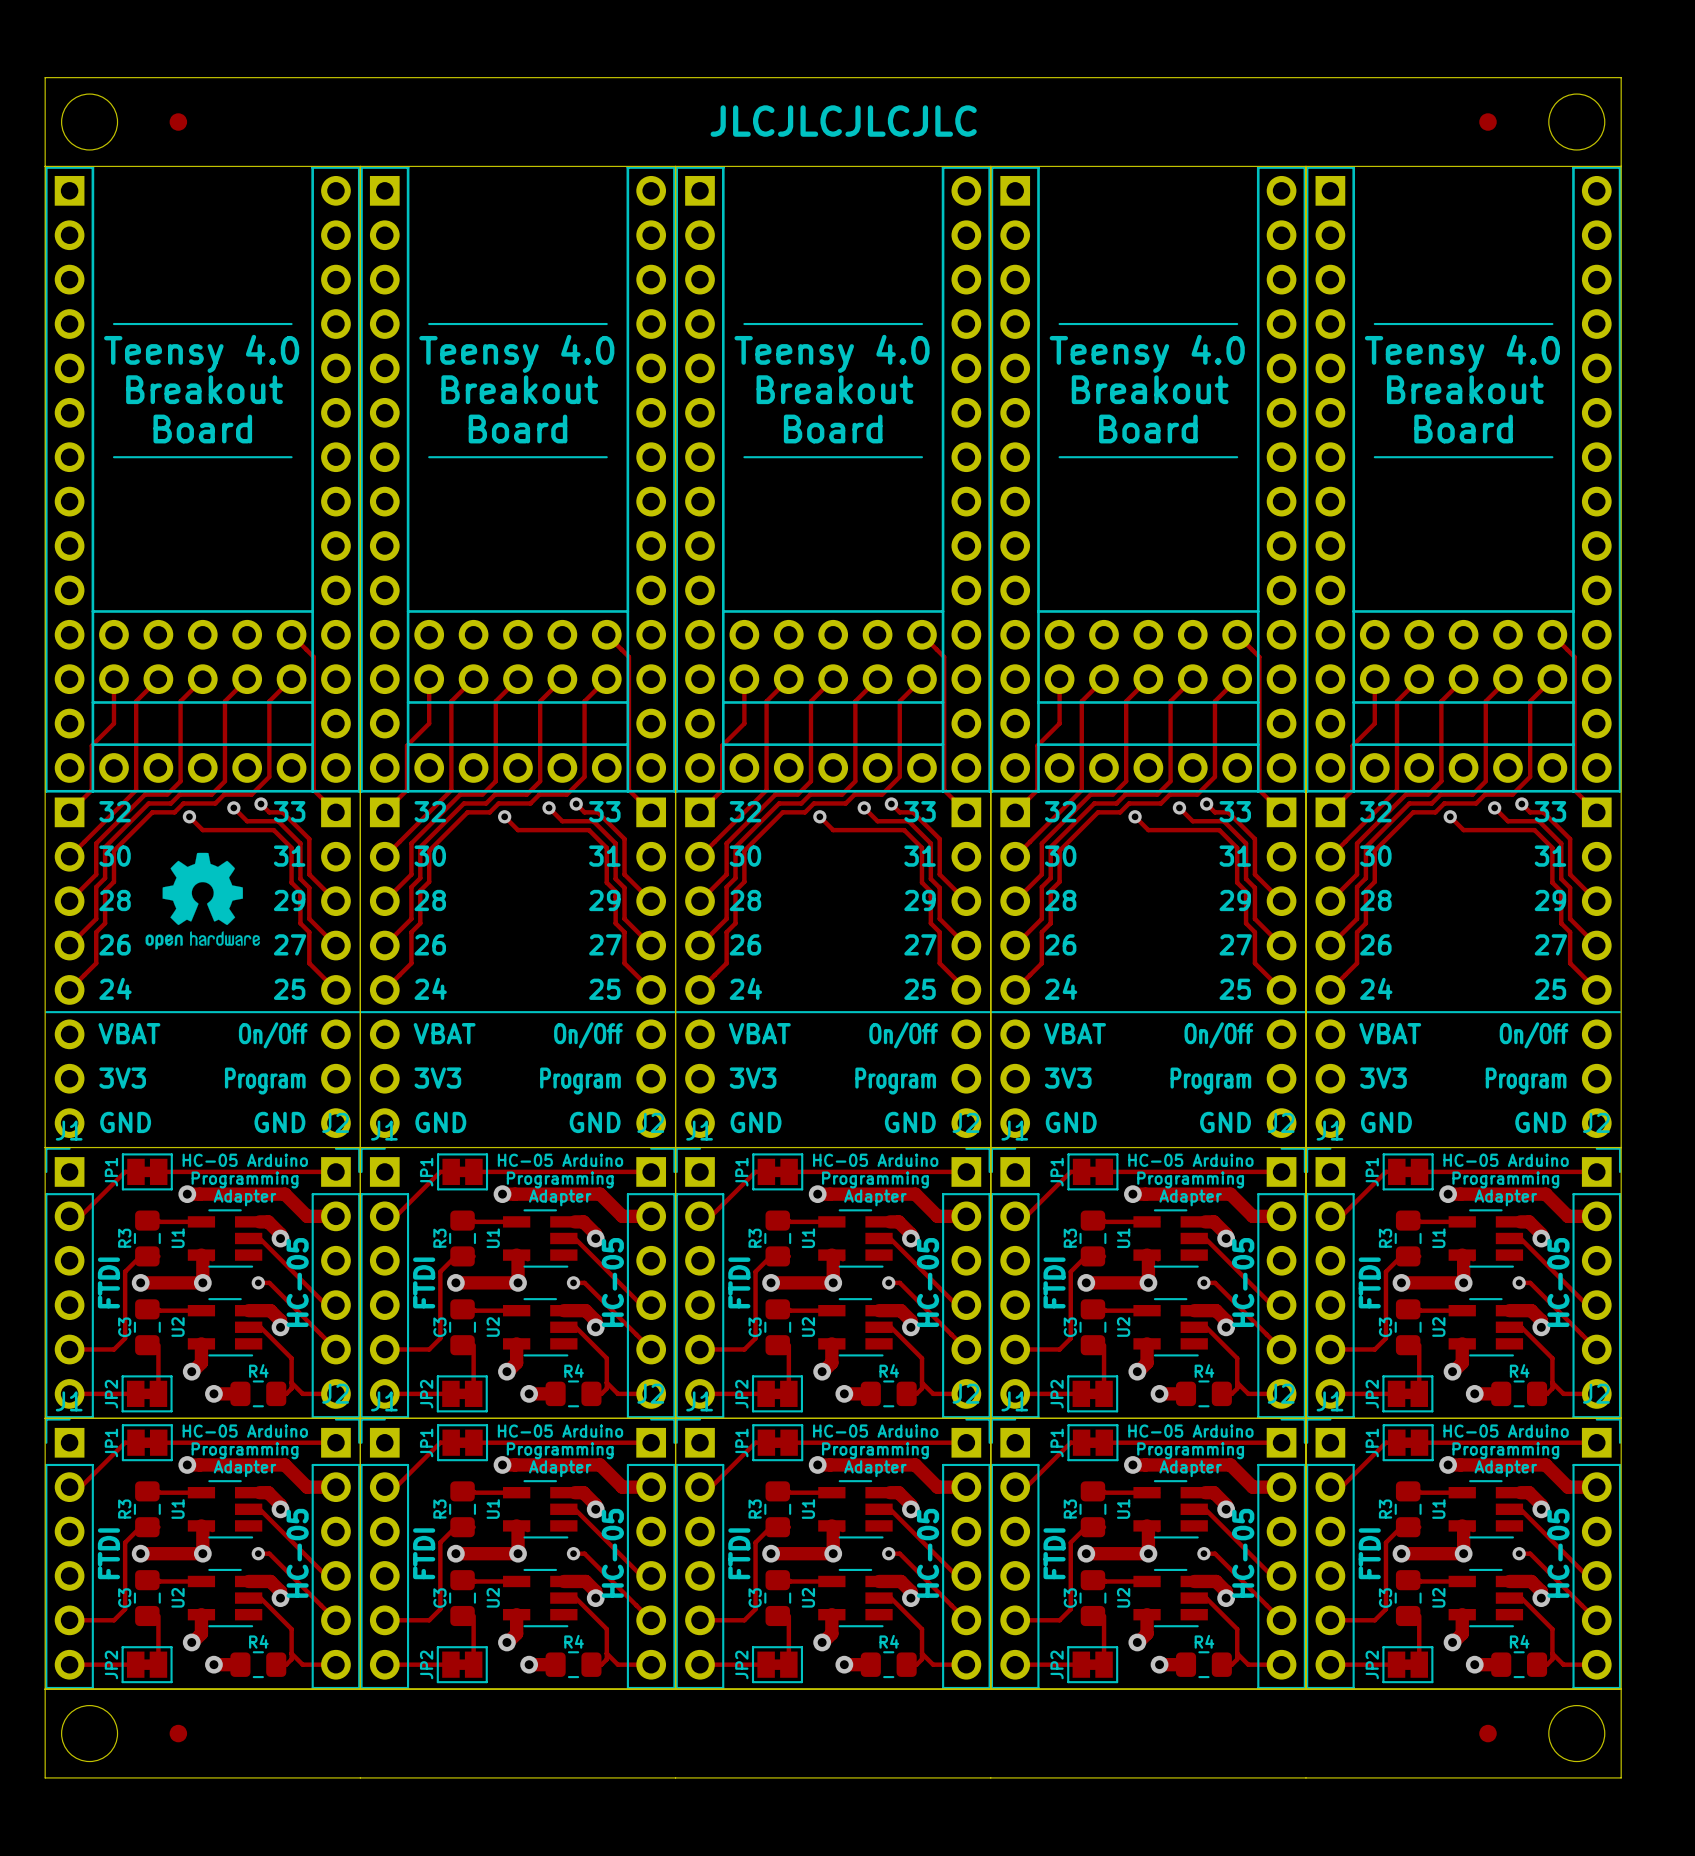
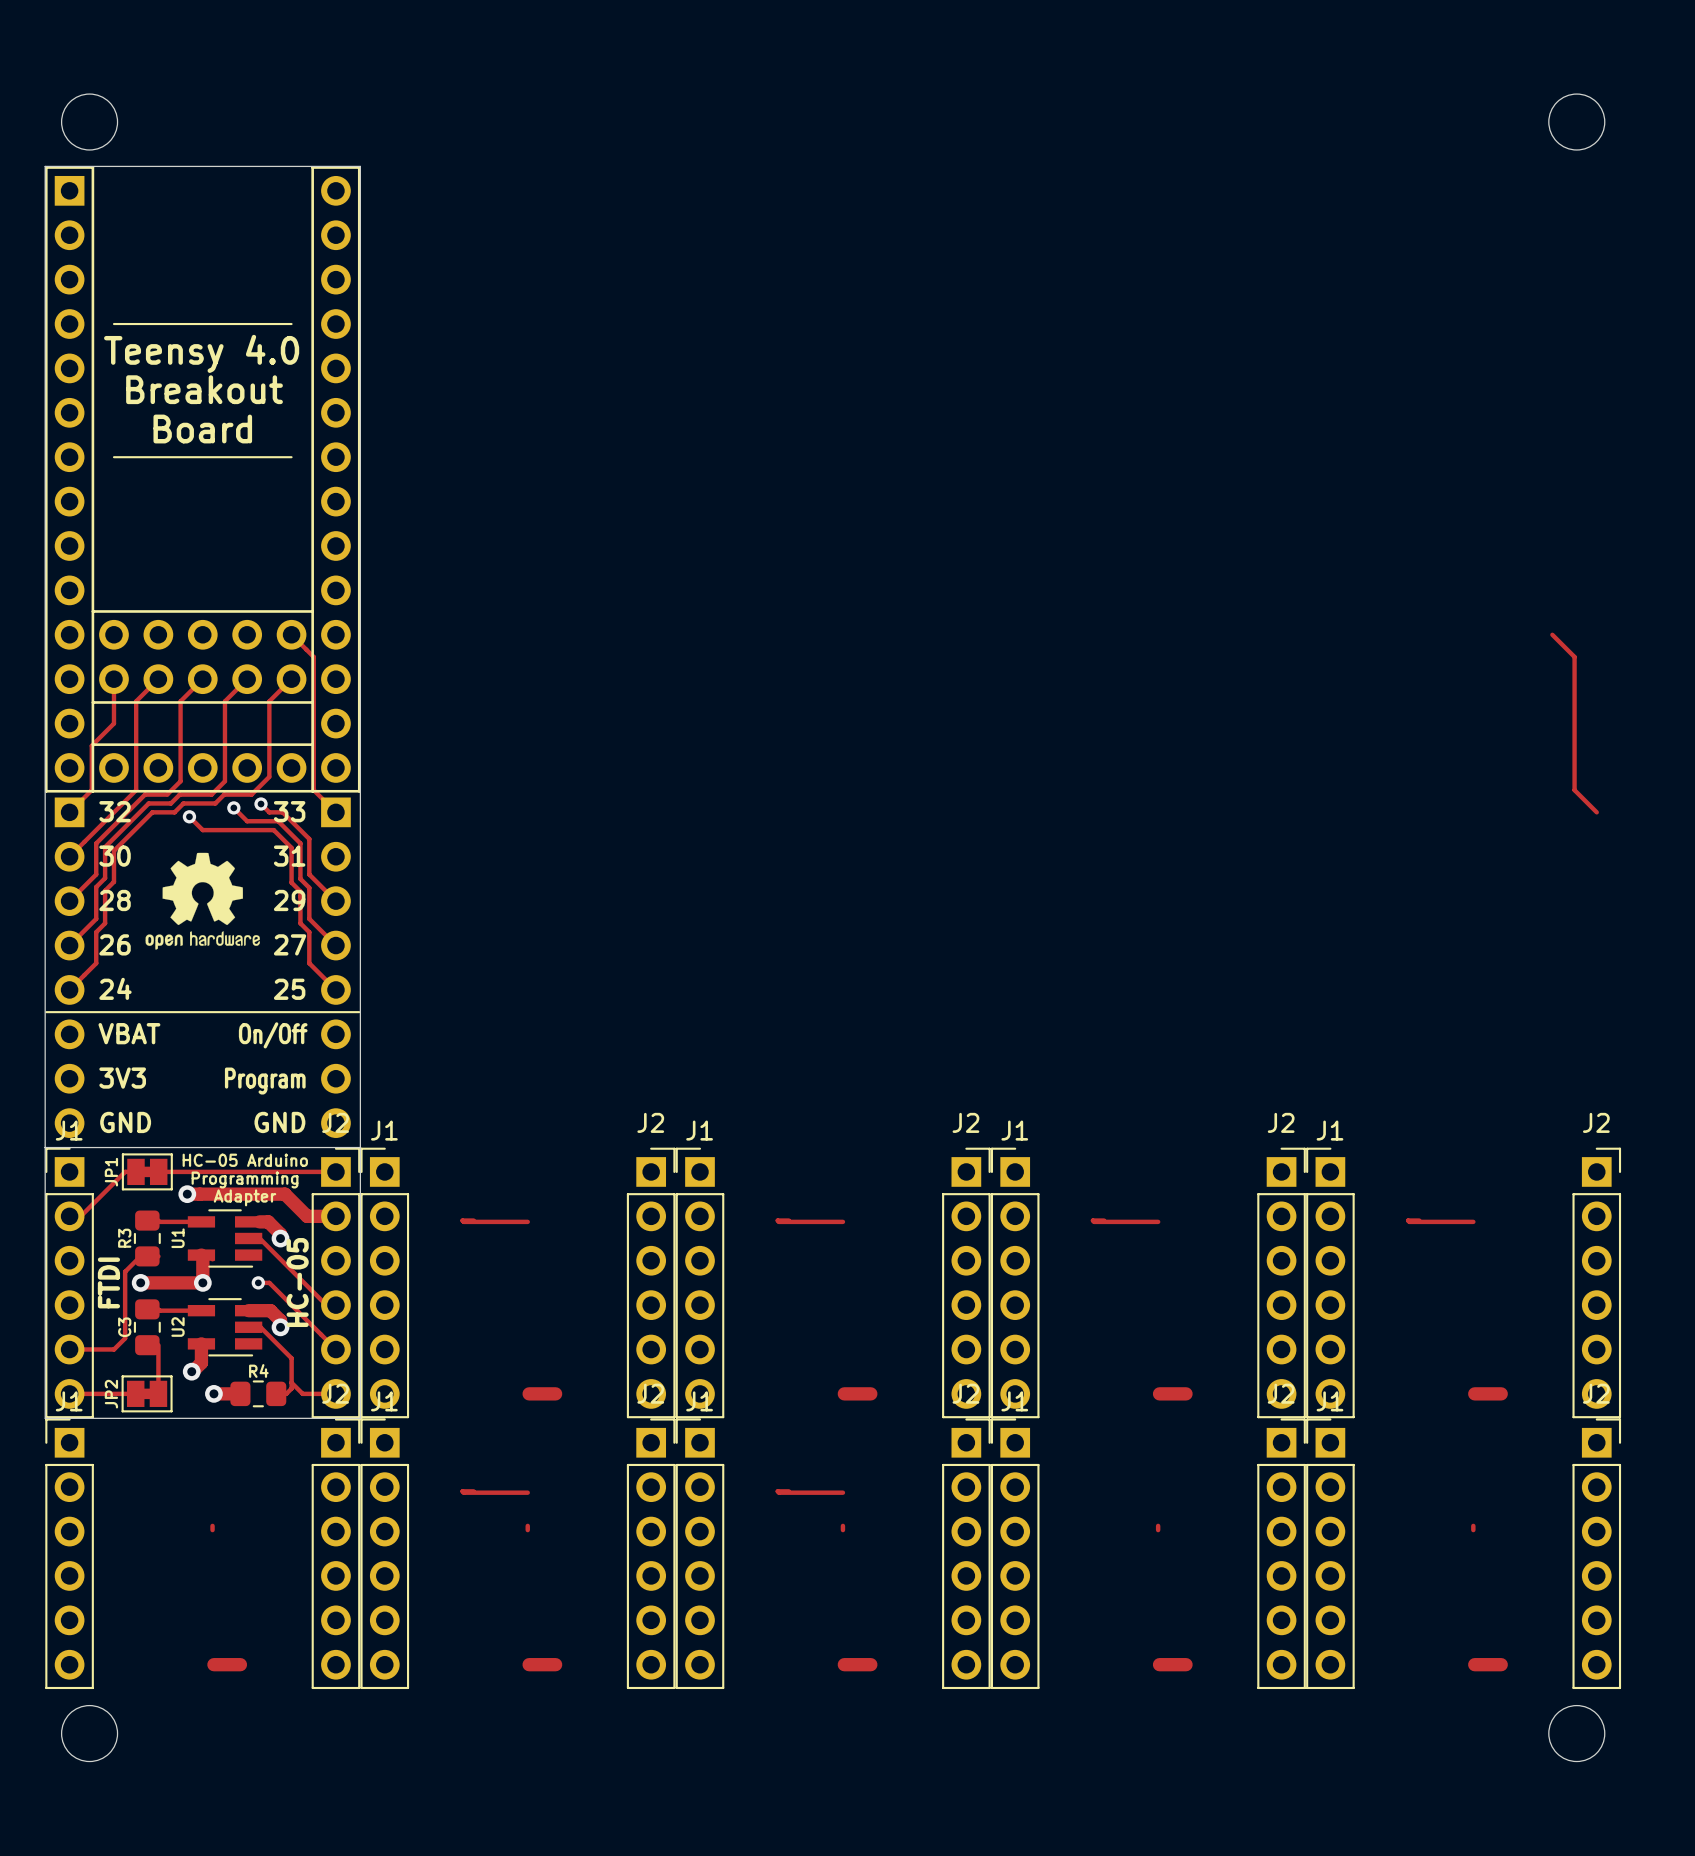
text: JLCJLCJLCJLC (843, 121) -> none
part: (178, 122) -> none
part: (1488, 122) -> none
board edge: (45, 166) (45, 77) (1621, 77) (1621, 1777) (45, 1777) (45, 1147) -> (45, 1418) (45, 1147)
board edge: (360, 166) (1621, 166) -> none
board edge: (675, 166) (675, 1689) (675, 1418) (675, 1147) -> none
board edge: (990, 166) (990, 1689) (990, 1147) -> none
board edge: (1305, 166) (1305, 1689) (1305, 1418) (1305, 1147) -> none
line: (429, 324) (606, 324) -> none
line: (744, 324) (921, 324) -> none
line: (1059, 324) (1237, 324) -> none
line: (1374, 324) (1552, 324) -> none
text: Teensy 4.0 (516, 353) -> none
text: Teensy 4.0 (832, 353) -> none
text: Teensy 4.0 (1147, 353) -> none
text: Teensy 4.0 (1462, 353) -> none
text: Breakout (519, 389) -> none
text: Breakout (834, 389) -> none
text: Breakout (1150, 389) -> none
text: Breakout (1465, 389) -> none
text: Board (517, 429) -> none
text: Board (833, 429) -> none
text: Board (1148, 429) -> none
text: Board (1463, 429) -> none
line: (429, 457) (606, 457) -> none
line: (744, 457) (921, 457) -> none
line: (1059, 457) (1237, 457) -> none
line: (1374, 457) (1552, 457) -> none
part: (517, 479) -> none
part: (833, 479) -> none
part: (1148, 479) -> none
part: (1463, 479) -> none
track: (606, 634) (628, 656) (628, 790) (651, 812) -> none
track: (921, 634) (944, 656) (944, 790) (966, 812) -> none
track: (1237, 634) (1259, 656) (1259, 790) (1281, 812) -> none
track: (429, 679) (429, 723) (406, 745) (406, 790) (384, 812) -> none
track: (473, 679) (451, 701) (451, 790) (384, 856) -> none
track: (517, 679) (495, 701) (495, 781) (482, 794) (460, 794) (411, 843) (411, 874) (384, 901) -> none
track: (562, 679) (540, 701) (540, 781) (526, 794) (494, 794) -> none
track: (606, 679) (584, 701) (584, 776) (566, 794) (539, 794) (530, 803) (498, 803) (489, 812) (467, 812) (429, 850) (429, 881) (420, 890) (420, 923) (411, 932) (411, 963) (384, 989) -> none
track: (744, 679) (744, 723) (722, 745) (722, 790) (699, 812) -> none
track: (788, 679) (766, 701) (766, 790) (699, 856) -> none
track: (833, 679) (810, 701) (810, 781) (797, 794) (775, 794) (726, 843) (726, 874) (699, 901) -> none
track: (877, 679) (855, 701) (855, 781) (842, 794) (810, 794) -> none
track: (921, 679) (899, 701) (899, 776) (882, 794) (854, 794) (845, 803) (813, 803) (805, 812) (782, 812) (744, 850) (744, 881) (735, 890) (735, 923) (726, 932) (726, 963) (699, 989) -> none
track: (1059, 679) (1059, 723) (1037, 745) (1037, 790) (1015, 812) -> none
track: (1103, 679) (1081, 701) (1081, 790) (1015, 856) -> none
track: (1148, 679) (1126, 701) (1126, 781) (1112, 794) (1090, 794) (1041, 843) (1041, 874) (1015, 901) -> none
track: (1192, 679) (1170, 701) (1170, 781) (1157, 794) (1125, 794) -> none
track: (1237, 679) (1214, 701) (1214, 776) (1197, 794) (1169, 794) (1160, 803) (1129, 803) (1120, 812) (1098, 812) (1059, 850) (1059, 881) (1050, 890) (1050, 923) (1041, 932) (1041, 963) (1015, 989) -> none
track: (1374, 679) (1374, 723) (1352, 745) (1352, 790) (1330, 812) -> none
track: (1419, 679) (1396, 701) (1396, 790) (1330, 856) -> none
track: (1463, 679) (1441, 701) (1441, 781) (1428, 794) (1405, 794) (1357, 843) (1357, 874) (1330, 901) -> none
track: (1507, 679) (1485, 701) (1485, 781) (1472, 794) (1440, 794) -> none
track: (1552, 679) (1530, 701) (1530, 776) (1512, 794) (1485, 794) (1476, 803) (1444, 803) (1435, 812) (1413, 812) (1374, 850) (1374, 881) (1365, 890) (1365, 923) (1357, 932) (1357, 963) (1330, 989) -> none
track: (494, 794) (486, 803) (463, 803) (420, 847) (420, 878) (411, 887) (411, 918) (384, 945) -> none
track: (810, 794) (801, 803) (779, 803) (735, 847) (735, 878) (726, 887) (726, 918) (699, 945) -> none
track: (1125, 794) (1116, 803) (1094, 803) (1050, 847) (1050, 878) (1041, 887) (1041, 918) (1015, 945) -> none
track: (1440, 794) (1431, 803) (1409, 803) (1365, 847) (1365, 878) (1357, 887) (1357, 918) (1330, 945) -> none
track: (576, 804) (584, 812) (597, 812) (624, 838) (624, 874) (651, 901) -> none
via: (576, 804) -> none
track: (891, 804) (899, 812) (913, 812) (939, 838) (939, 874) (966, 901) -> none
via: (891, 804) -> none
track: (1206, 804) (1214, 812) (1228, 812) (1254, 838) (1254, 874) (1281, 901) -> none
via: (1206, 804) -> none
track: (1521, 804) (1530, 812) (1543, 812) (1570, 838) (1570, 874) (1596, 901) -> none
via: (1521, 804) -> none
track: (549, 807) (562, 821) (593, 821) (615, 843) (615, 878) (624, 887) (624, 918) (651, 945) -> none
via: (549, 807) -> none
track: (864, 807) (877, 821) (908, 821) (930, 843) (930, 878) (939, 887) (939, 918) (966, 945) -> none
via: (864, 807) -> none
track: (1179, 807) (1192, 821) (1223, 821) (1246, 843) (1246, 878) (1254, 887) (1254, 918) (1281, 945) -> none
via: (1179, 807) -> none
track: (1494, 807) (1507, 821) (1539, 821) (1561, 843) (1561, 878) (1570, 887) (1570, 918) (1596, 945) -> none
via: (1494, 807) -> none
text: 32 (430, 811) -> none
text: 33 (604, 811) -> none
text: 32 (745, 811) -> none
text: 33 (920, 811) -> none
text: 32 (1060, 811) -> none
text: 33 (1235, 811) -> none
text: 32 (1375, 811) -> none
text: 33 (1550, 811) -> none
track: (504, 816) (517, 830) (589, 830) (606, 847) (606, 882) (615, 891) (615, 923) (624, 932) (624, 963) (651, 989) -> none
via: (504, 816) -> none
track: (819, 816) (833, 830) (904, 830) (921, 847) (921, 882) (930, 891) (930, 923) (939, 932) (939, 963) (966, 989) -> none
via: (819, 816) -> none
track: (1135, 816) (1148, 830) (1219, 830) (1237, 847) (1237, 882) (1246, 891) (1246, 923) (1254, 932) (1254, 963) (1281, 989) -> none
via: (1135, 816) -> none
track: (1450, 816) (1463, 830) (1534, 830) (1552, 847) (1552, 882) (1561, 891) (1561, 923) (1570, 932) (1570, 963) (1596, 989) -> none
via: (1450, 816) -> none
text: 30 (430, 856) -> none
text: 31 (604, 856) -> none
text: 30 (745, 856) -> none
text: 31 (920, 856) -> none
text: 30 (1060, 856) -> none
text: 31 (1235, 856) -> none
text: 30 (1375, 856) -> none
text: 31 (1550, 856) -> none
text: 28 (430, 900) -> none
text: 29 (604, 900) -> none
text: 28 (745, 900) -> none
text: 29 (920, 900) -> none
text: 28 (1060, 900) -> none
text: 29 (1235, 900) -> none
text: 28 (1375, 900) -> none
text: 29 (1550, 900) -> none
text: 26 (430, 944) -> none
text: 27 (605, 944) -> none
text: 26 (745, 944) -> none
text: 27 (920, 944) -> none
text: 26 (1060, 944) -> none
text: 27 (1235, 944) -> none
text: 26 (1375, 944) -> none
text: 27 (1550, 944) -> none
part: (384, 967) -> none
part: (651, 967) -> none
part: (699, 967) -> none
part: (966, 967) -> none
part: (1015, 967) -> none
part: (1281, 967) -> none
part: (1330, 967) -> none
part: (1596, 967) -> none
text: 24 (430, 988) -> none
text: 24 (745, 988) -> none
text: 24 (1061, 988) -> none
text: 24 (1376, 988) -> none
text: 25 (604, 989) -> none
text: 25 (920, 989) -> none
text: 25 (1235, 989) -> none
text: 25 (1550, 989) -> none
line: (361, 1012) (674, 1012) -> none
line: (676, 1012) (989, 1012) -> none
line: (991, 1012) (1304, 1012) -> none
line: (1307, 1012) (1620, 1012) -> none
text: VBAT (444, 1033) -> none
text: VBAT (759, 1033) -> none
text: VBAT (1075, 1033) -> none
text: VBAT (1390, 1033) -> none
text: On/Off (588, 1035) -> none
text: On/Off (903, 1035) -> none
text: On/Off (1218, 1035) -> none
text: On/Off (1534, 1035) -> none
text: 3V3 (437, 1078) -> none
text: 3V3 (753, 1078) -> none
text: 3V3 (1068, 1078) -> none
text: 3V3 (1383, 1078) -> none
text: Program (580, 1081) -> none
text: Program (895, 1081) -> none
text: Program (1210, 1081) -> none
text: Program (1526, 1081) -> none
text: GND (440, 1122) -> none
text: GND (595, 1122) -> none
text: GND (756, 1122) -> none
text: GND (910, 1122) -> none
text: GND (1071, 1122) -> none
text: GND (1225, 1122) -> none
text: GND (1386, 1122) -> none
text: GND (1540, 1122) -> none
board edge: (1621, 1147) (360, 1147) (360, 1689) (360, 1418) (1621, 1418) -> none
text: HC-05 Arduino (560, 1160) -> none
text: HC-05 Arduino (875, 1160) -> none
text: HC-05 Arduino (1190, 1160) -> none
text: HC-05 Arduino (1506, 1160) -> none
track: (451, 1171) (440, 1171) (395, 1216) (384, 1216) -> none
JP1: (462, 1171) -> none
track: (473, 1171) (651, 1171) -> none
track: (766, 1171) (755, 1171) (711, 1216) (699, 1216) -> none
JP1: (777, 1171) -> none
track: (789, 1171) (966, 1171) -> none
track: (1081, 1171) (1070, 1171) (1026, 1216) (1015, 1216) -> none
JP1: (1092, 1171) -> none
track: (1104, 1171) (1281, 1171) -> none
track: (1396, 1171) (1385, 1171) (1341, 1216) (1330, 1216) -> none
JP1: (1408, 1171) -> none
track: (1419, 1171) (1596, 1171) -> none
text: Programming (560, 1179) -> none
text: Programming (875, 1179) -> none
text: Programming (1190, 1179) -> none
text: Programming (1505, 1179) -> none
track: (502, 1194) (600, 1194) (622, 1216) (651, 1216) -> none
via: (502, 1194) -> none
track: (817, 1194) (915, 1194) (937, 1216) (966, 1216) -> none
via: (817, 1194) -> none
track: (1132, 1194) (1230, 1194) (1252, 1216) (1281, 1216) -> none
via: (1132, 1194) -> none
track: (1448, 1194) (1545, 1194) (1567, 1216) (1596, 1216) -> none
via: (1448, 1194) -> none
text: Adapter (560, 1197) -> none
text: Adapter (875, 1197) -> none
text: Adapter (1190, 1197) -> none
text: Adapter (1505, 1197) -> none
track: (574, 1221) (583, 1221) (595, 1234) (595, 1238) -> none
track: (890, 1221) (898, 1221) (910, 1234) (910, 1238) -> none
track: (1205, 1221) (1213, 1221) (1226, 1234) (1226, 1238) -> none
track: (1520, 1221) (1529, 1221) (1541, 1234) (1541, 1238) -> none
R3: (462, 1238) -> none
U1: (540, 1238) -> none
track: (574, 1238) (641, 1305) (651, 1305) -> none
via: (595, 1238) -> none
R3: (777, 1238) -> none
U1: (855, 1238) -> none
track: (890, 1238) (956, 1305) (966, 1305) -> none
via: (910, 1238) -> none
R3: (1092, 1238) -> none
U1: (1170, 1238) -> none
track: (1205, 1238) (1271, 1305) (1281, 1305) -> none
via: (1226, 1238) -> none
R3: (1408, 1238) -> none
U1: (1485, 1238) -> none
track: (1520, 1238) (1587, 1305) (1596, 1305) -> none
via: (1541, 1238) -> none
track: (516, 1255) (518, 1282) (455, 1282) -> none
track: (831, 1255) (833, 1282) (771, 1282) -> none
track: (1147, 1255) (1148, 1282) (1086, 1282) -> none
track: (1462, 1255) (1463, 1282) (1401, 1282) -> none
track: (473, 1256) (455, 1256) (440, 1271) (440, 1338) (429, 1349) (384, 1349) -> none
track: (788, 1256) (770, 1256) (755, 1271) (755, 1338) (744, 1349) (700, 1349) -> none
track: (1104, 1256) (1086, 1256) (1070, 1271) (1070, 1338) (1059, 1349) (1015, 1349) -> none
track: (1419, 1256) (1401, 1256) (1385, 1271) (1385, 1338) (1374, 1349) (1330, 1349) -> none
text: FTDI (424, 1282) -> none
via: (455, 1282) -> none
via: (518, 1282) -> none
track: (573, 1282) (584, 1282) (651, 1349) -> none
via: (573, 1282) -> none
text: HC-05 (612, 1282) -> none
text: FTDI (739, 1282) -> none
via: (771, 1282) -> none
via: (833, 1282) -> none
track: (888, 1282) (899, 1282) (966, 1349) -> none
via: (888, 1282) -> none
text: HC-05 (928, 1282) -> none
text: FTDI (1054, 1282) -> none
via: (1086, 1282) -> none
via: (1148, 1282) -> none
track: (1203, 1282) (1215, 1282) (1281, 1349) -> none
via: (1203, 1282) -> none
text: HC-05 (1243, 1282) -> none
text: FTDI (1369, 1282) -> none
via: (1401, 1282) -> none
via: (1463, 1282) -> none
track: (1519, 1282) (1530, 1282) (1596, 1349) -> none
via: (1519, 1282) -> none
text: HC-05 (1558, 1282) -> none
track: (473, 1309) (527, 1310) -> none
track: (788, 1309) (842, 1310) -> none
track: (1104, 1309) (1158, 1310) -> none
track: (1419, 1309) (1473, 1310) -> none
track: (563, 1310) (585, 1310) (595, 1320) (595, 1327) -> none
track: (879, 1310) (900, 1310) (910, 1320) (910, 1327) -> none
track: (1194, 1310) (1216, 1310) (1226, 1320) (1226, 1327) -> none
track: (1509, 1310) (1531, 1310) (1541, 1320) (1541, 1327) -> none
C3: (462, 1327) -> none
U2: (540, 1327) -> none
track: (574, 1327) (606, 1358) (606, 1388) (601, 1393) (591, 1393) -> none
via: (595, 1327) -> none
C3: (777, 1327) -> none
U2: (855, 1327) -> none
track: (890, 1327) (922, 1358) (922, 1388) (916, 1393) (906, 1393) -> none
via: (910, 1327) -> none
C3: (1092, 1327) -> none
U2: (1170, 1327) -> none
track: (1205, 1327) (1237, 1358) (1237, 1388) (1231, 1393) (1221, 1393) -> none
via: (1226, 1327) -> none
C3: (1408, 1327) -> none
U2: (1485, 1327) -> none
track: (1520, 1327) (1552, 1358) (1552, 1388) (1547, 1393) (1537, 1393) -> none
via: (1541, 1327) -> none
track: (516, 1343) (516, 1362) (506, 1371) -> none
track: (831, 1343) (831, 1362) (822, 1371) -> none
track: (1147, 1343) (1147, 1362) (1137, 1371) -> none
track: (1462, 1343) (1462, 1362) (1452, 1371) -> none
track: (473, 1345) (473, 1393) -> none
track: (788, 1345) (788, 1393) -> none
track: (1104, 1345) (1104, 1393) -> none
track: (1419, 1345) (1419, 1393) -> none
via: (506, 1371) -> none
via: (822, 1371) -> none
via: (1137, 1371) -> none
via: (1452, 1371) -> none
track: (606, 1382) (617, 1393) (651, 1393) -> none
track: (922, 1382) (933, 1393) (966, 1393) -> none
track: (1237, 1382) (1248, 1393) (1281, 1393) -> none
track: (1552, 1382) (1563, 1393) (1596, 1393) -> none
track: (384, 1393) (450, 1393) -> none
JP2: (462, 1393) -> none
via: (529, 1393) -> none
R4: (573, 1393) -> none
track: (700, 1393) (766, 1393) -> none
JP2: (777, 1393) -> none
via: (844, 1393) -> none
R4: (888, 1393) -> none
track: (1015, 1393) (1081, 1393) -> none
JP2: (1092, 1393) -> none
via: (1159, 1393) -> none
R4: (1203, 1393) -> none
track: (1330, 1393) (1396, 1393) -> none
JP2: (1407, 1393) -> none
via: (1474, 1393) -> none
R4: (1519, 1393) -> none
text: HC-05 Arduino (245, 1431) -> none
text: HC-05 Arduino (560, 1431) -> none
text: HC-05 Arduino (875, 1431) -> none
text: HC-05 Arduino (1190, 1431) -> none
text: HC-05 Arduino (1506, 1431) -> none
track: (135, 1442) (125, 1442) (80, 1487) (69, 1487) -> none
JP1: (147, 1442) -> none
track: (158, 1442) (336, 1442) -> none
track: (451, 1442) (440, 1442) (395, 1487) (384, 1487) -> none
JP1: (462, 1442) -> none
track: (473, 1442) (651, 1442) -> none
track: (766, 1442) (755, 1442) (711, 1487) (699, 1487) -> none
JP1: (777, 1442) -> none
track: (789, 1442) (966, 1442) -> none
track: (1081, 1442) (1070, 1442) (1026, 1487) (1015, 1487) -> none
JP1: (1092, 1442) -> none
track: (1104, 1442) (1281, 1442) -> none
track: (1396, 1442) (1385, 1442) (1341, 1487) (1330, 1487) -> none
JP1: (1408, 1442) -> none
track: (1419, 1442) (1596, 1442) -> none
text: Programming (245, 1450) -> none
text: Programming (560, 1450) -> none
text: Programming (875, 1450) -> none
text: Programming (1190, 1450) -> none
text: Programming (1505, 1450) -> none
track: (187, 1464) (284, 1464) (307, 1487) (335, 1487) -> none
via: (187, 1464) -> none
track: (502, 1464) (600, 1464) (622, 1487) (651, 1487) -> none
via: (502, 1464) -> none
track: (817, 1464) (915, 1464) (937, 1487) (966, 1487) -> none
via: (817, 1464) -> none
track: (1132, 1464) (1230, 1464) (1252, 1487) (1281, 1487) -> none
via: (1132, 1464) -> none
track: (1448, 1464) (1545, 1464) (1567, 1487) (1596, 1487) -> none
via: (1448, 1464) -> none
text: Adapter (245, 1468) -> none
text: Adapter (560, 1468) -> none
text: Adapter (875, 1468) -> none
text: Adapter (1190, 1468) -> none
text: Adapter (1505, 1468) -> none
track: (158, 1491) (147, 1491) (212, 1492) -> none
track: (1104, 1491) (1092, 1491) (1158, 1492) -> none
track: (1419, 1491) (1408, 1491) (1473, 1492) -> none
track: (259, 1492) (268, 1492) (280, 1504) (280, 1509) -> none
track: (574, 1492) (583, 1492) (595, 1504) (595, 1509) -> none
track: (890, 1492) (898, 1492) (910, 1504) (910, 1509) -> none
track: (1205, 1492) (1213, 1492) (1226, 1504) (1226, 1509) -> none
track: (1520, 1492) (1529, 1492) (1541, 1504) (1541, 1509) -> none
R3: (147, 1509) -> none
U1: (225, 1509) -> none
track: (259, 1509) (326, 1575) (335, 1575) -> none
via: (280, 1509) -> none
R3: (462, 1509) -> none
U1: (540, 1509) -> none
track: (574, 1509) (641, 1575) (651, 1575) -> none
via: (595, 1509) -> none
R3: (777, 1509) -> none
U1: (855, 1509) -> none
track: (890, 1509) (956, 1575) (966, 1575) -> none
via: (910, 1509) -> none
R3: (1092, 1509) -> none
U1: (1170, 1509) -> none
track: (1205, 1509) (1271, 1575) (1281, 1575) -> none
via: (1226, 1509) -> none
R3: (1408, 1509) -> none
U1: (1485, 1509) -> none
track: (1520, 1509) (1587, 1575) (1596, 1575) -> none
via: (1541, 1509) -> none
track: (201, 1525) (202, 1553) (140, 1553) -> none
track: (516, 1525) (518, 1553) (455, 1553) -> none
track: (831, 1525) (833, 1553) (771, 1553) -> none
track: (1147, 1525) (1148, 1553) (1086, 1553) -> none
track: (1462, 1525) (1463, 1553) (1401, 1553) -> none
track: (158, 1527) (140, 1527) (125, 1542) (125, 1609) (114, 1620) (69, 1620) -> none
track: (473, 1527) (455, 1527) (440, 1542) (440, 1609) (429, 1620) (384, 1620) -> none
track: (788, 1527) (770, 1527) (755, 1542) (755, 1609) (744, 1620) (700, 1620) -> none
track: (1104, 1527) (1086, 1527) (1070, 1542) (1070, 1609) (1059, 1620) (1015, 1620) -> none
track: (1419, 1527) (1401, 1527) (1385, 1542) (1385, 1609) (1374, 1620) (1330, 1620) -> none
text: FTDI (108, 1553) -> none
via: (140, 1553) -> none
via: (202, 1553) -> none
track: (258, 1553) (269, 1553) (336, 1620) -> none
via: (258, 1553) -> none
text: HC-05 (297, 1553) -> none
text: FTDI (424, 1553) -> none
via: (455, 1553) -> none
via: (518, 1553) -> none
track: (573, 1553) (584, 1553) (651, 1620) -> none
via: (573, 1553) -> none
text: HC-05 (612, 1553) -> none
text: FTDI (739, 1553) -> none
via: (771, 1553) -> none
via: (833, 1553) -> none
track: (888, 1553) (899, 1553) (966, 1620) -> none
via: (888, 1553) -> none
text: HC-05 (928, 1553) -> none
text: FTDI (1054, 1553) -> none
via: (1086, 1553) -> none
via: (1148, 1553) -> none
track: (1203, 1553) (1215, 1553) (1281, 1620) -> none
via: (1203, 1553) -> none
text: HC-05 (1243, 1553) -> none
text: FTDI (1369, 1553) -> none
via: (1401, 1553) -> none
via: (1463, 1553) -> none
track: (1519, 1553) (1530, 1553) (1596, 1620) -> none
via: (1519, 1553) -> none
text: HC-05 (1558, 1553) -> none
track: (158, 1580) (212, 1581) -> none
track: (473, 1580) (527, 1581) -> none
track: (788, 1580) (842, 1581) -> none
track: (1104, 1580) (1158, 1581) -> none
track: (1419, 1580) (1473, 1581) -> none
track: (248, 1581) (270, 1581) (280, 1591) (280, 1598) -> none
track: (563, 1581) (585, 1581) (595, 1591) (595, 1598) -> none
track: (879, 1581) (900, 1581) (910, 1591) (910, 1598) -> none
track: (1194, 1581) (1216, 1581) (1226, 1591) (1226, 1598) -> none
track: (1509, 1581) (1531, 1581) (1541, 1591) (1541, 1598) -> none
C3: (147, 1598) -> none
U2: (225, 1598) -> none
track: (259, 1598) (291, 1629) (291, 1659) (286, 1664) (276, 1664) -> none
via: (280, 1598) -> none
C3: (462, 1598) -> none
U2: (540, 1598) -> none
track: (574, 1598) (606, 1629) (606, 1659) (601, 1664) (591, 1664) -> none
via: (595, 1598) -> none
C3: (777, 1598) -> none
U2: (855, 1598) -> none
track: (890, 1598) (922, 1629) (922, 1659) (916, 1664) (906, 1664) -> none
via: (910, 1598) -> none
C3: (1092, 1598) -> none
U2: (1170, 1598) -> none
track: (1205, 1598) (1237, 1629) (1237, 1659) (1231, 1664) (1221, 1664) -> none
via: (1226, 1598) -> none
C3: (1408, 1598) -> none
U2: (1485, 1598) -> none
track: (1520, 1598) (1552, 1629) (1552, 1659) (1547, 1664) (1537, 1664) -> none
via: (1541, 1598) -> none
track: (201, 1614) (201, 1633) (191, 1642) -> none
track: (516, 1614) (516, 1633) (506, 1642) -> none
track: (831, 1614) (831, 1633) (822, 1642) -> none
track: (1147, 1614) (1147, 1633) (1137, 1642) -> none
track: (1462, 1614) (1462, 1633) (1452, 1642) -> none
track: (158, 1616) (158, 1664) -> none
track: (473, 1616) (473, 1664) -> none
track: (788, 1616) (788, 1664) -> none
track: (1104, 1616) (1104, 1664) -> none
track: (1419, 1616) (1419, 1664) -> none
via: (191, 1642) -> none
via: (506, 1642) -> none
via: (822, 1642) -> none
via: (1137, 1642) -> none
via: (1452, 1642) -> none
track: (291, 1653) (302, 1664) (336, 1664) -> none
track: (606, 1653) (617, 1664) (651, 1664) -> none
track: (922, 1653) (933, 1664) (966, 1664) -> none
track: (1237, 1653) (1248, 1664) (1281, 1664) -> none
track: (1552, 1653) (1563, 1664) (1596, 1664) -> none
track: (69, 1664) (135, 1664) -> none
JP2: (147, 1664) -> none
via: (213, 1664) -> none
R4: (258, 1664) -> none
track: (384, 1664) (450, 1664) -> none
JP2: (462, 1664) -> none
via: (529, 1664) -> none
R4: (573, 1664) -> none
track: (700, 1664) (766, 1664) -> none
JP2: (777, 1664) -> none
via: (844, 1664) -> none
R4: (888, 1664) -> none
track: (1015, 1664) (1081, 1664) -> none
JP2: (1092, 1664) -> none
via: (1159, 1664) -> none
R4: (1203, 1664) -> none
track: (1330, 1664) (1396, 1664) -> none
JP2: (1407, 1664) -> none
via: (1474, 1664) -> none
R4: (1519, 1664) -> none
board edge: (45, 1689) (1621, 1689) -> none
part: (178, 1733) -> none
part: (1488, 1733) -> none

